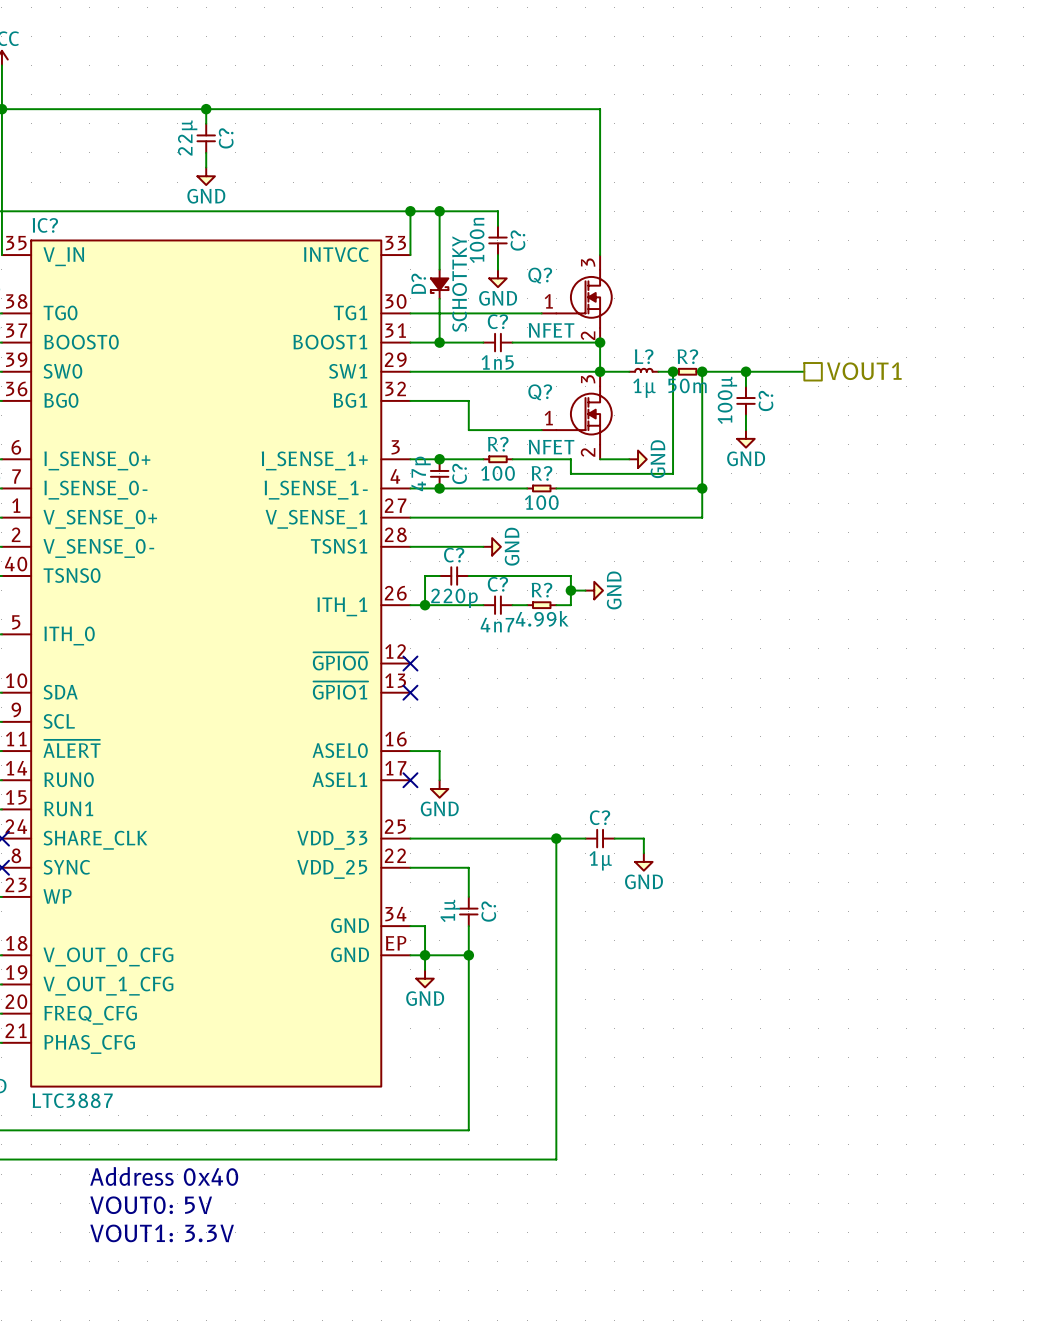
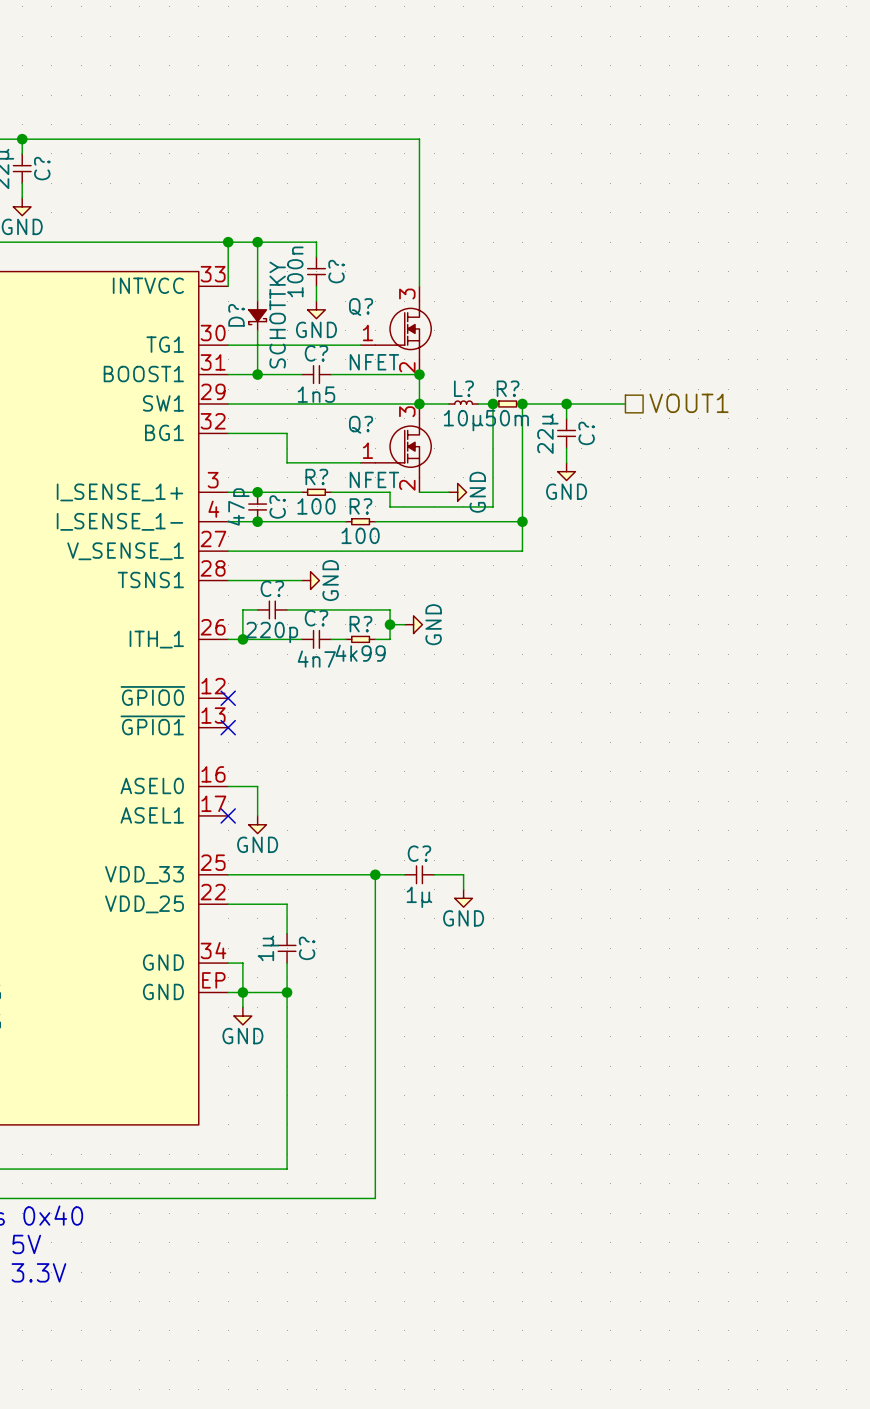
L? value: 1µ (644, 388) -> 10µ (463, 420)
C? value: 100µ (727, 400) -> 22µ (547, 433)
R? value: 4.99k (542, 618) -> 4k99 (360, 653)

